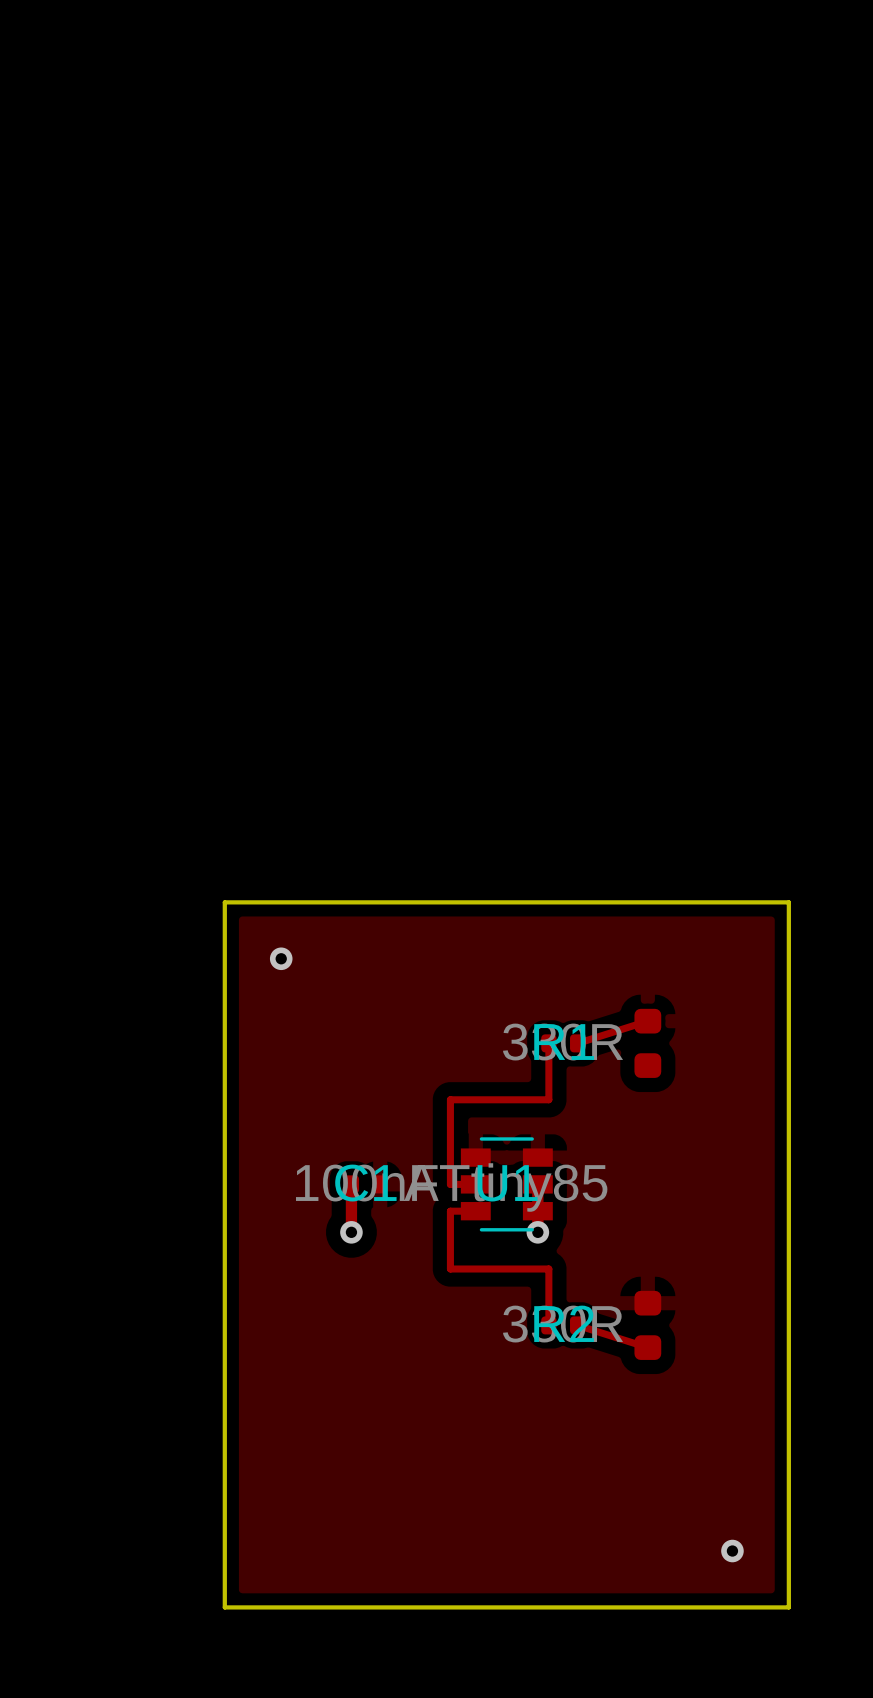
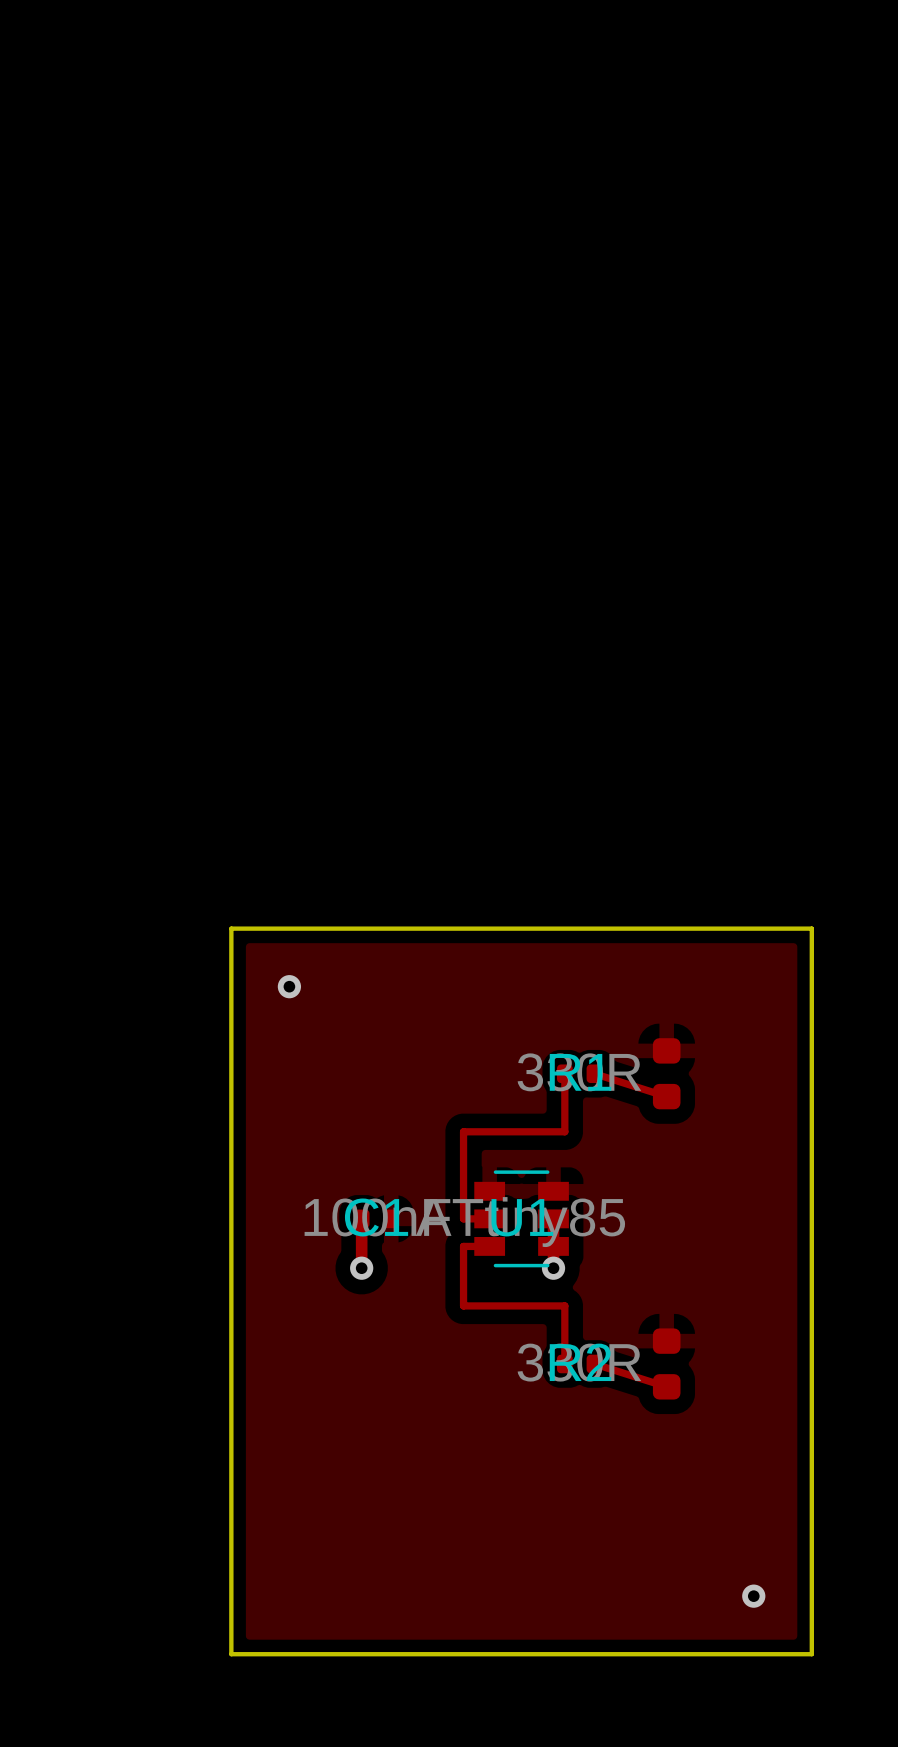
track: (647, 1021) (577, 1043) -> (666, 1096) (594, 1073)

